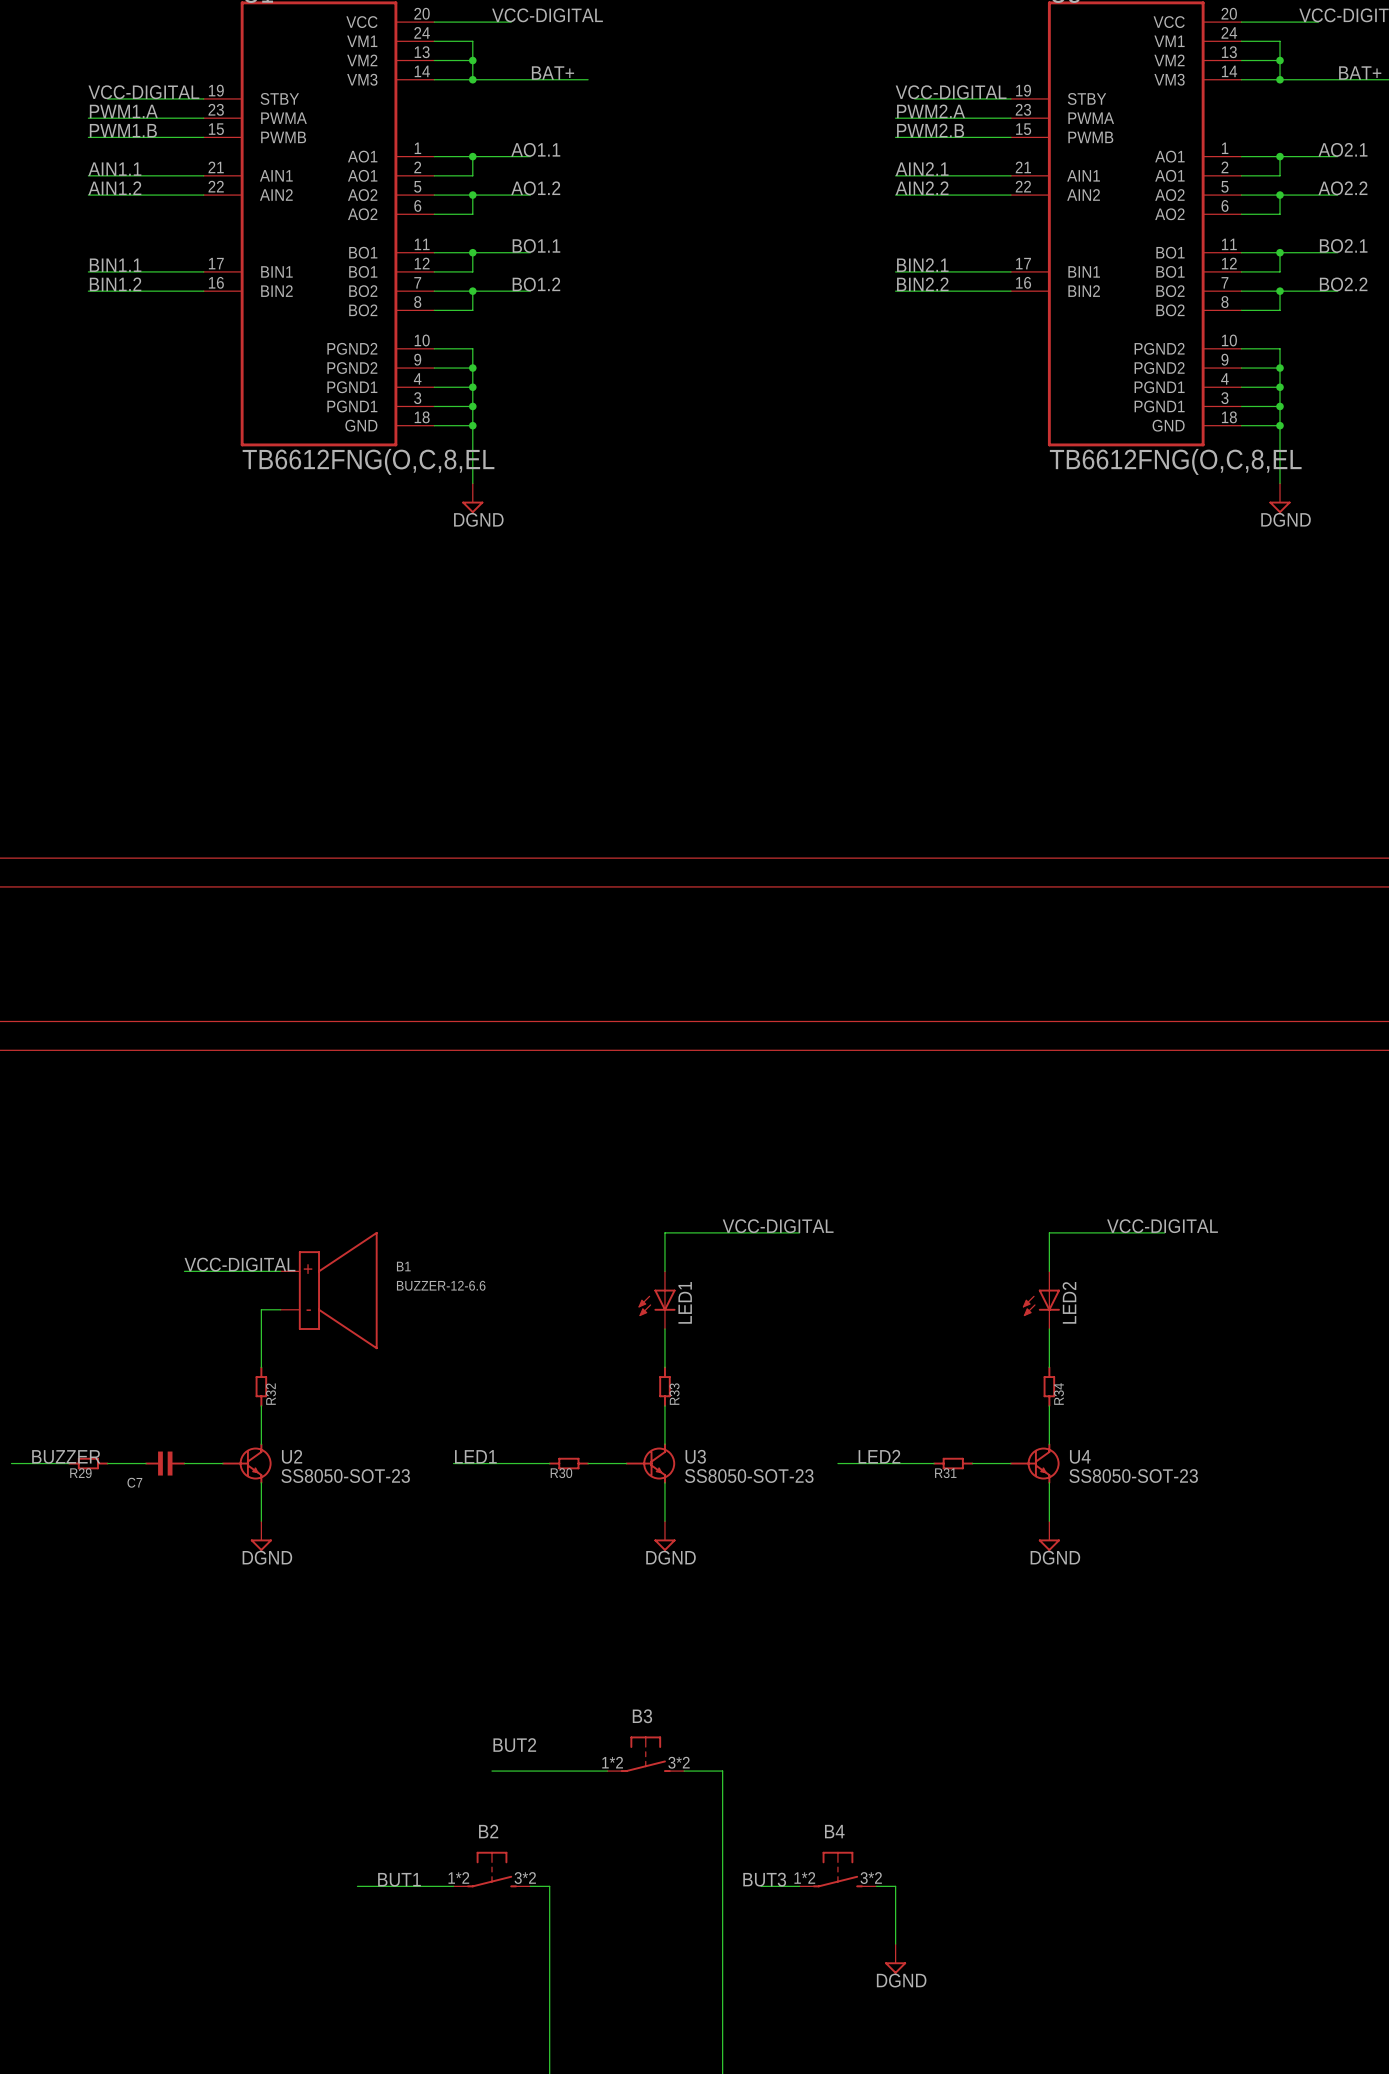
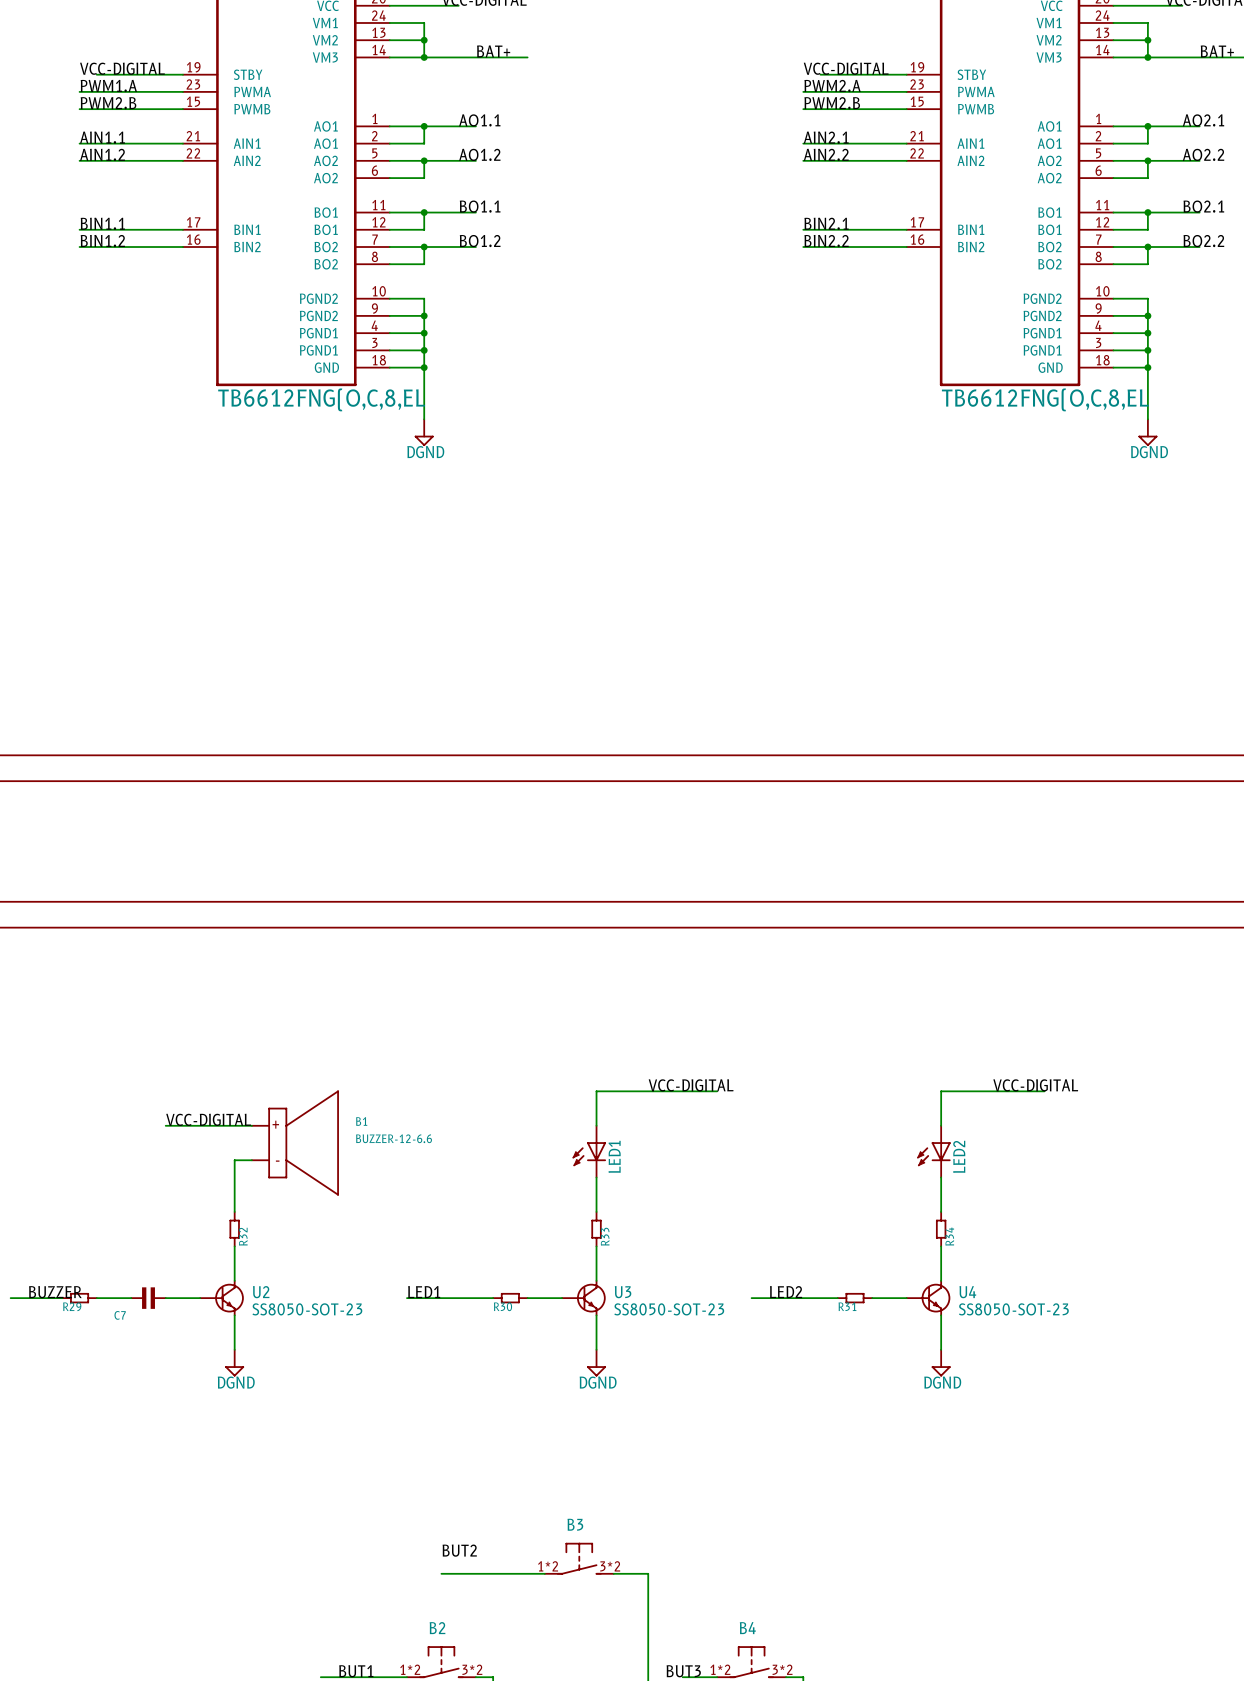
label: PWM1.B (123, 130) -> PWM2.B (108, 103)

